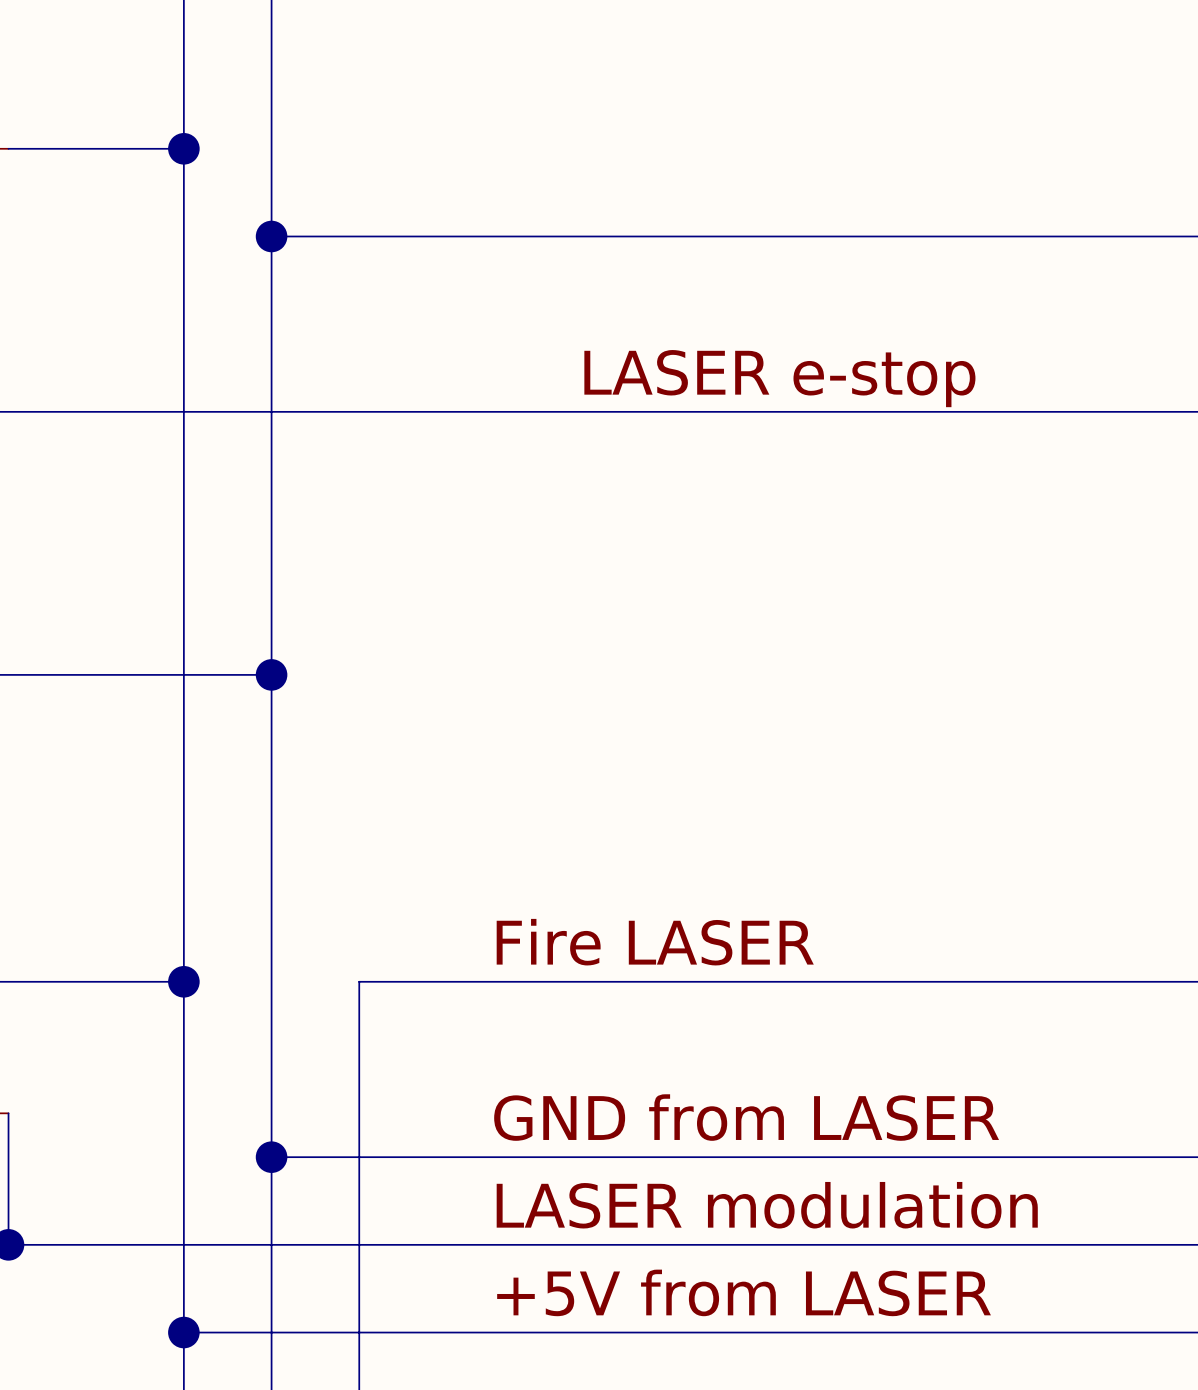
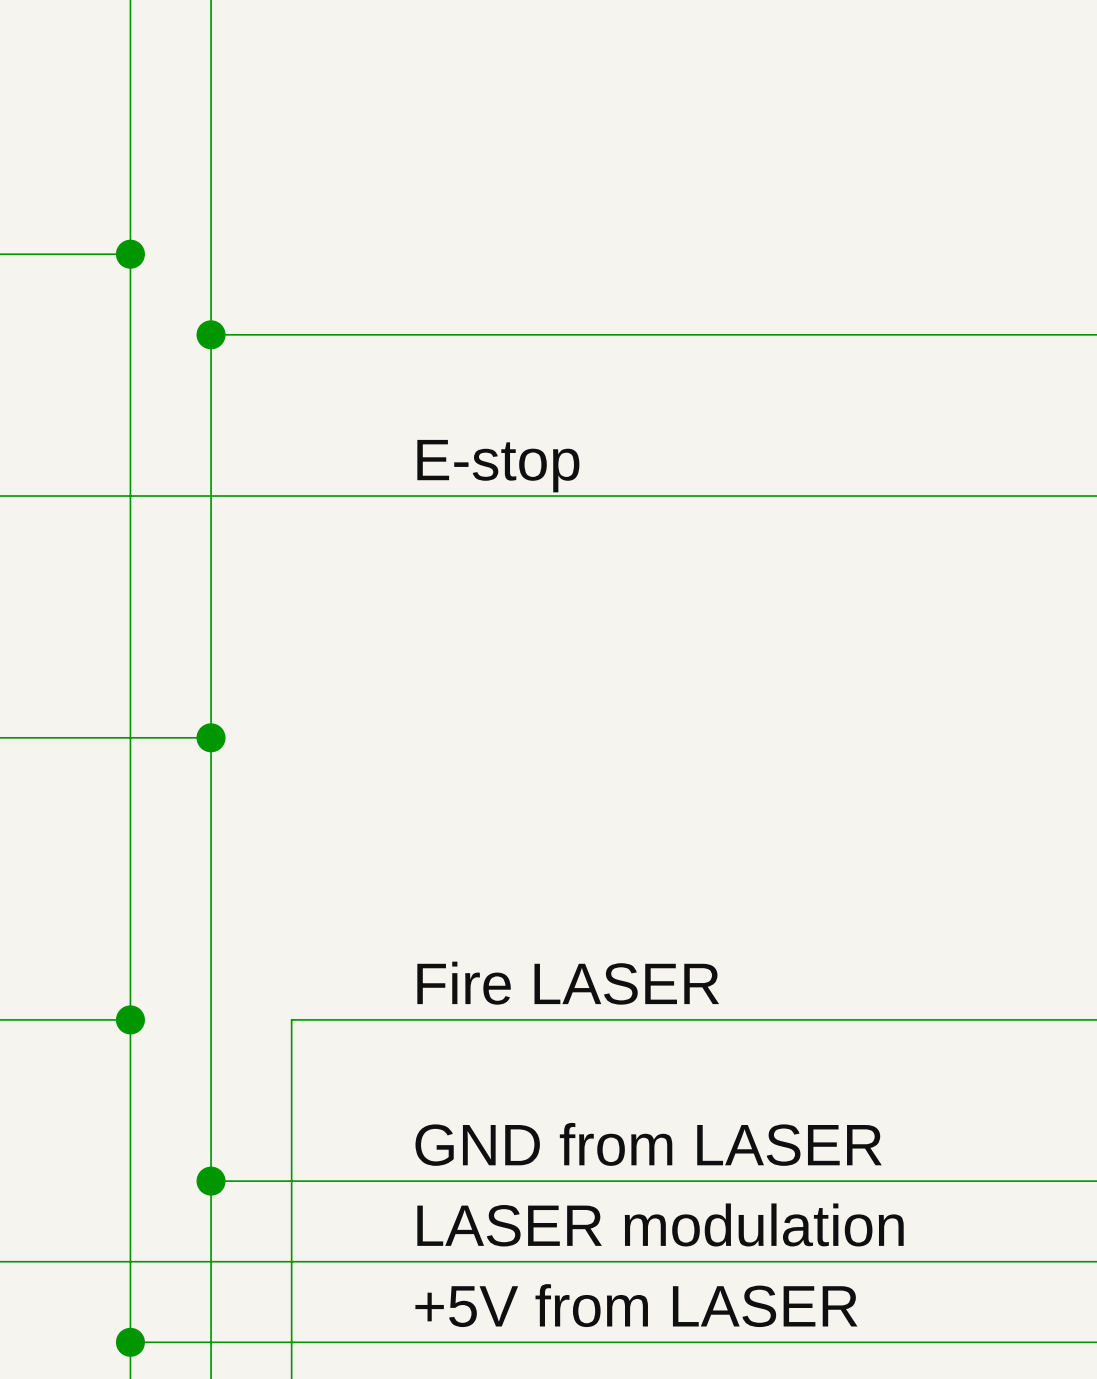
label: LASER e-stop (779, 378) -> E-stop (498, 466)

